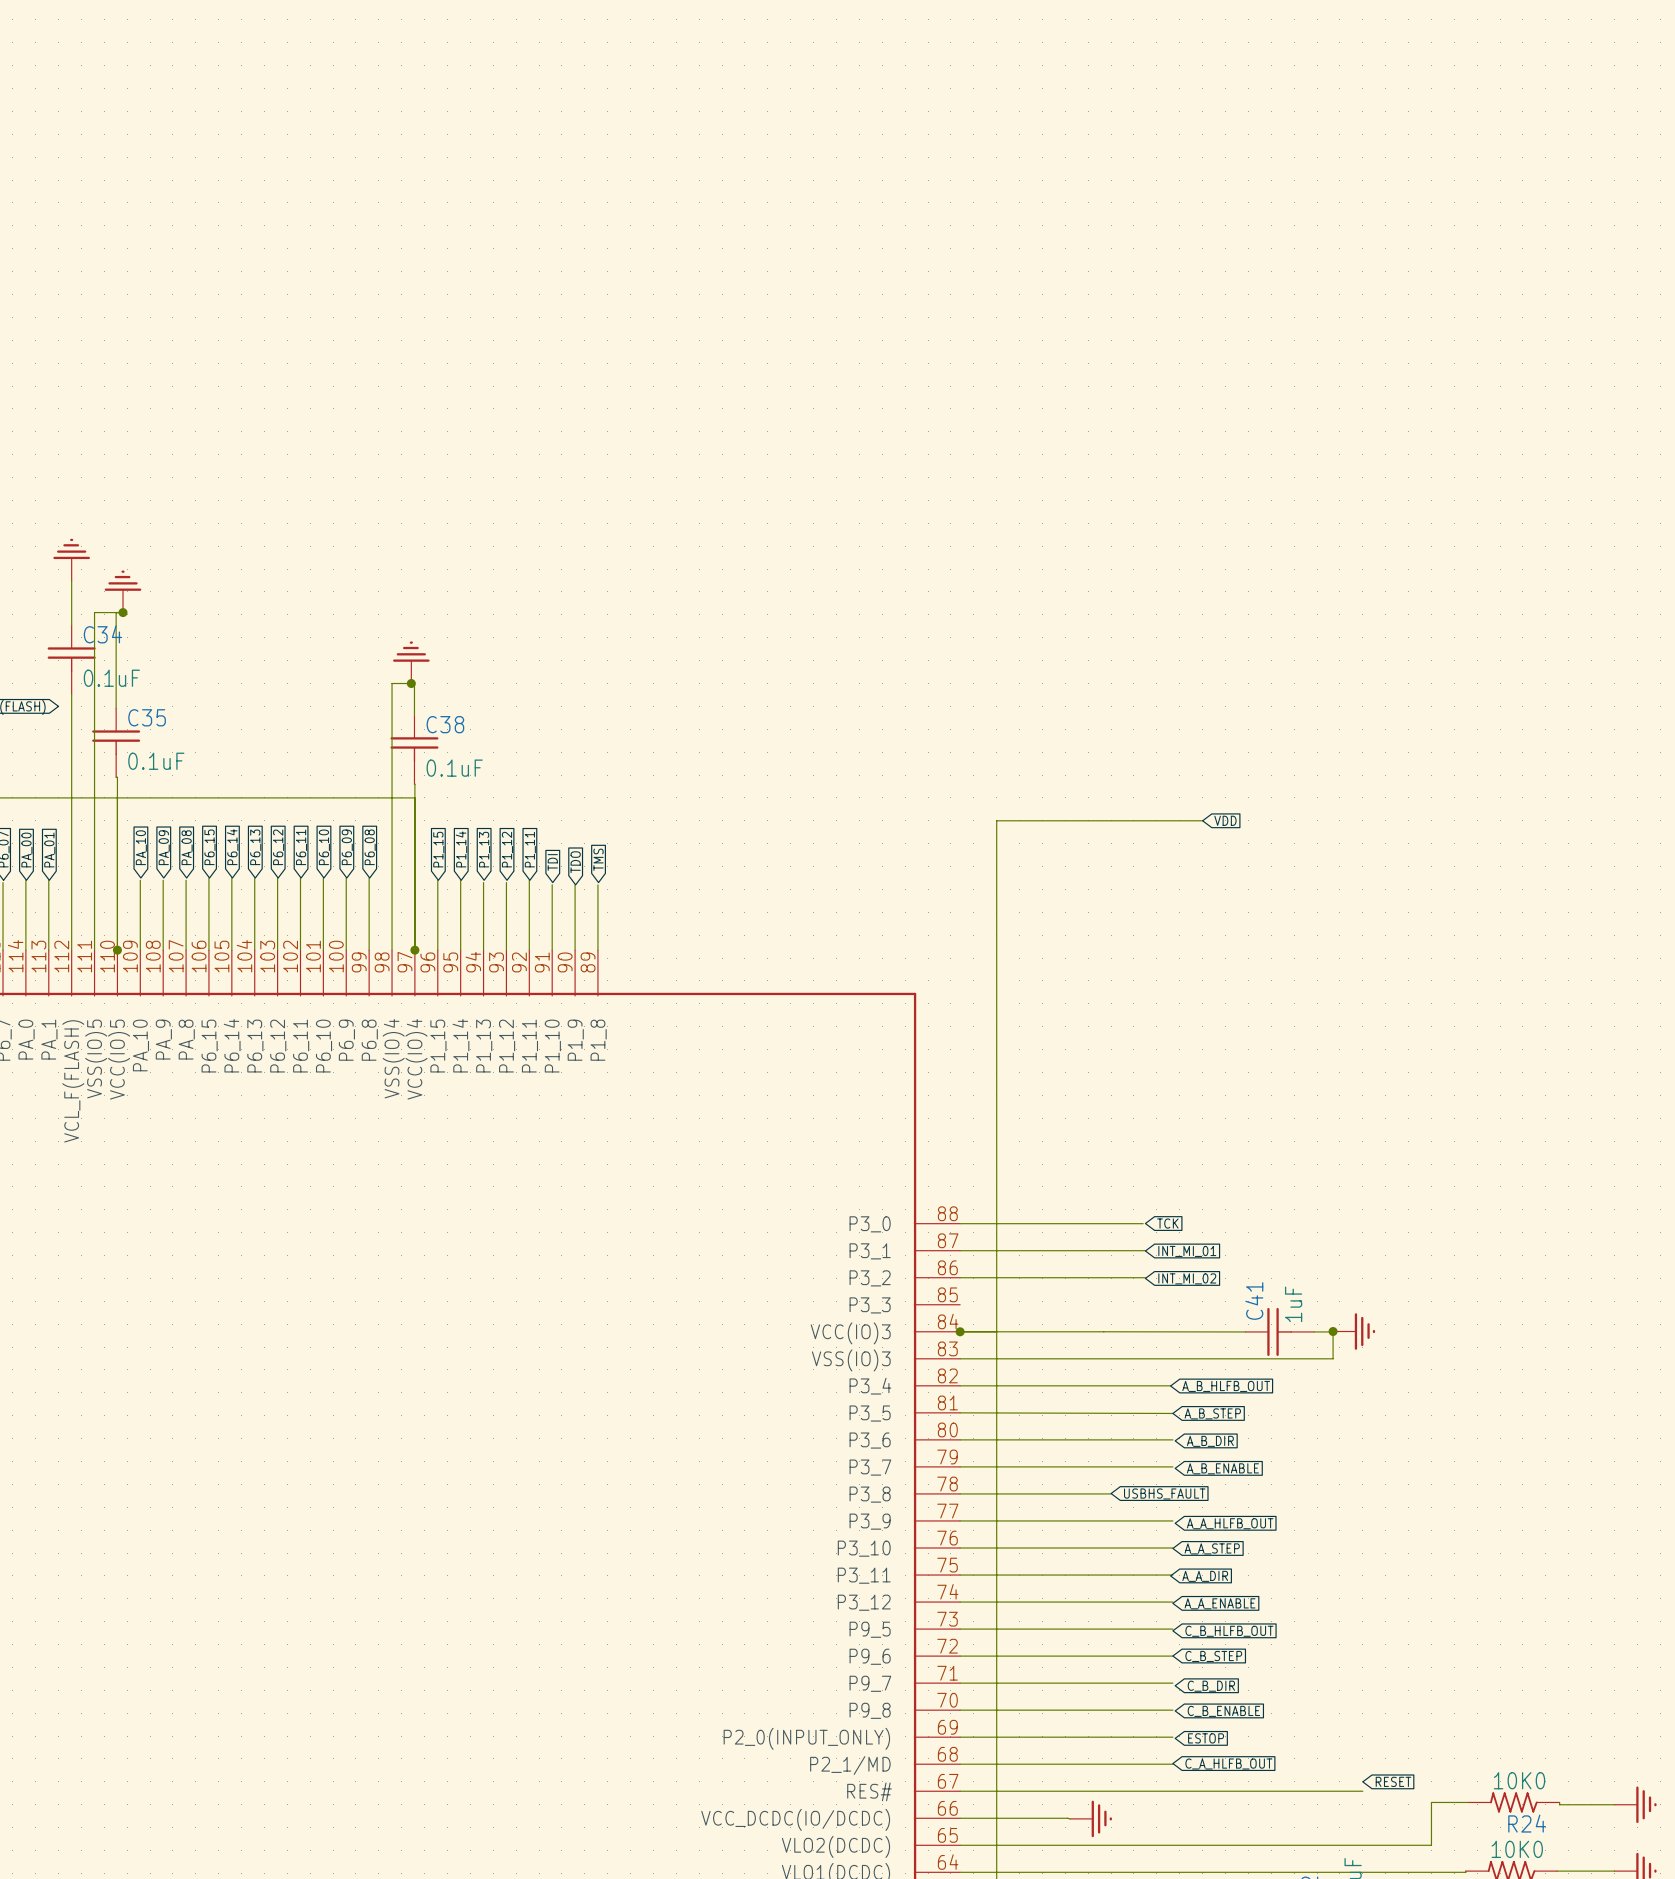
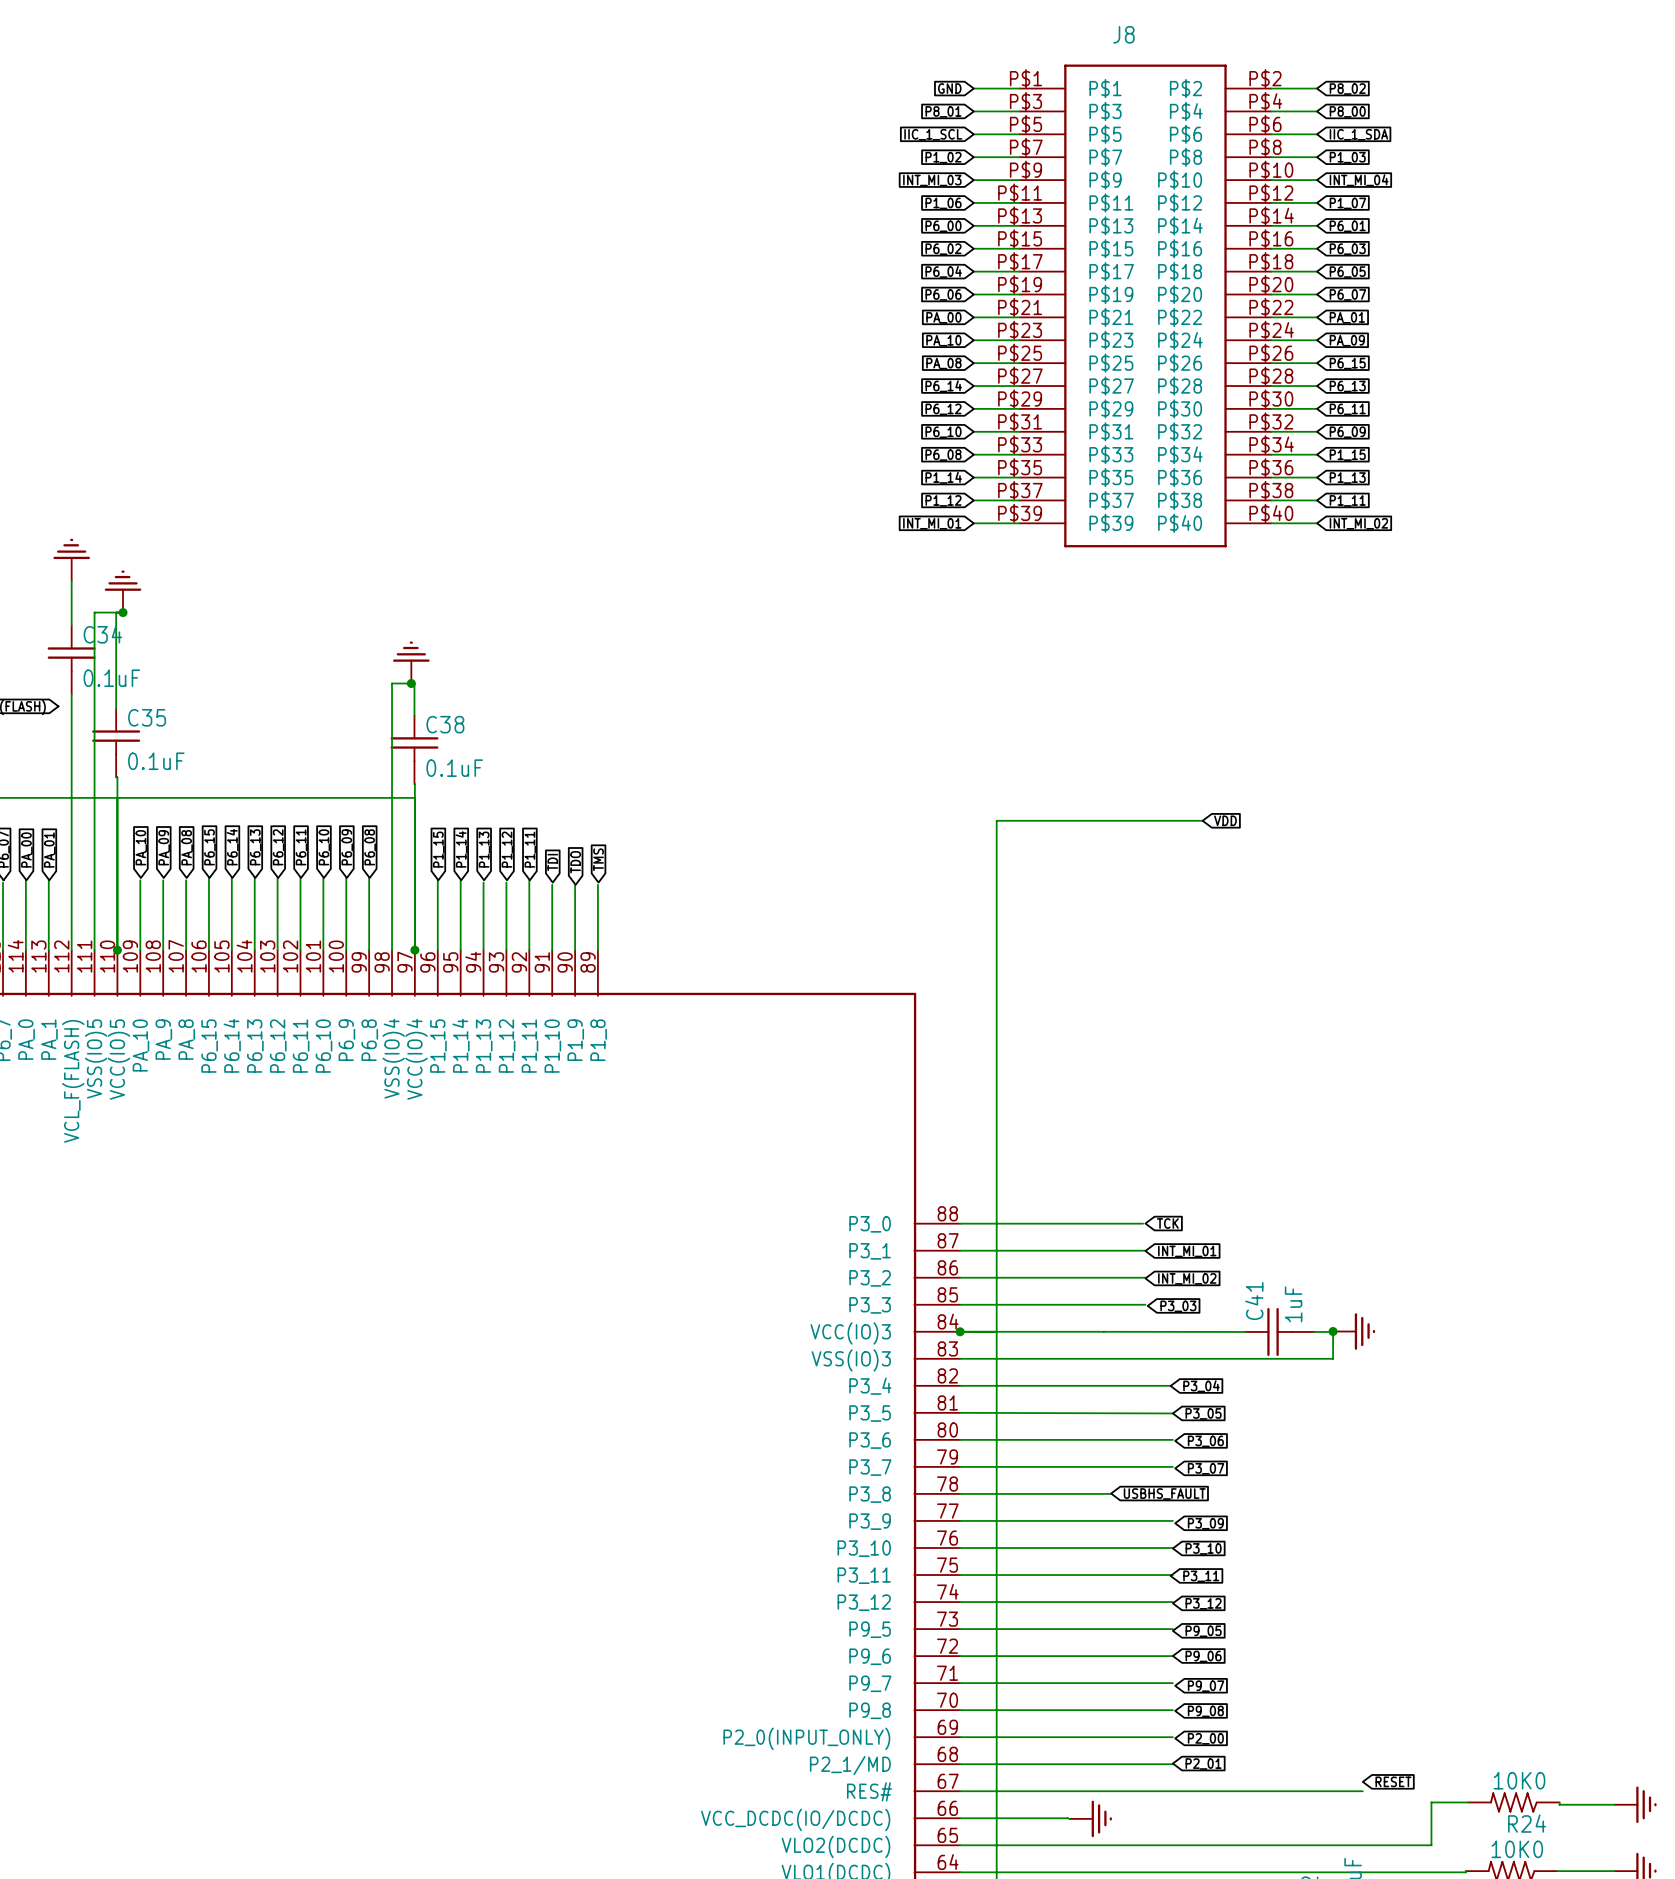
global label: none -> GND (949, 88)
wire: none -> (973, 88) (1019, 88)
wire: none -> (1271, 88) (1317, 88)
global label: none -> P8_02 (1347, 88)
global label: none -> P8_01 (943, 111)
wire: none -> (973, 111) (1019, 111)
wire: none -> (1271, 111) (1317, 111)
global label: none -> P8_00 (1347, 111)
global label: none -> IIC_1_SCL (933, 134)
wire: none -> (973, 134) (1019, 134)
wire: none -> (1271, 134) (1317, 134)
global label: none -> IIC_1_SDA (1358, 134)
global label: none -> P1_02 (943, 157)
wire: none -> (973, 157) (1019, 157)
wire: none -> (1271, 157) (1317, 157)
global label: none -> P1_03 (1347, 157)
global label: none -> INT_MI_03 (932, 180)
wire: none -> (973, 180) (1019, 180)
wire: none -> (1271, 180) (1317, 180)
global label: none -> INT_MI_04 (1359, 180)
wire: none -> (973, 202) (1019, 202)
wire: none -> (1271, 202) (1317, 202)
global label: none -> P1_06 (943, 203)
global label: none -> P1_07 (1347, 203)
wire: none -> (973, 225) (1019, 225)
wire: none -> (1271, 225) (1317, 225)
global label: none -> P6_00 (943, 226)
global label: none -> P6_01 (1347, 226)
wire: none -> (973, 248) (1019, 248)
wire: none -> (1271, 248) (1317, 248)
global label: none -> P6_02 (943, 249)
global label: none -> P6_03 (1347, 249)
global label: none -> P6_04 (943, 271)
wire: none -> (973, 271) (1019, 271)
wire: none -> (1271, 271) (1317, 271)
global label: none -> P6_05 (1347, 272)
global label: none -> P6_06 (943, 294)
wire: none -> (973, 294) (1019, 294)
wire: none -> (1271, 294) (1317, 294)
global label: none -> P6_07 (1347, 294)
J8: none -> (1145, 305)
global label: none -> PA_00 (943, 317)
wire: none -> (973, 317) (1019, 317)
wire: none -> (1271, 317) (1317, 317)
global label: none -> PA_01 (1347, 317)
global label: none -> PA_10 (943, 340)
wire: none -> (973, 340) (1019, 340)
wire: none -> (1271, 340) (1317, 340)
global label: none -> PA_09 (1347, 340)
global label: none -> PA_08 (943, 363)
wire: none -> (973, 363) (1019, 363)
wire: none -> (1271, 363) (1317, 363)
global label: none -> P6_15 (1347, 363)
global label: none -> P6_14 (943, 386)
wire: none -> (973, 386) (1019, 386)
wire: none -> (1271, 386) (1317, 386)
global label: none -> P6_13 (1347, 386)
wire: none -> (973, 408) (1019, 408)
wire: none -> (1271, 408) (1317, 408)
global label: none -> P6_12 (943, 409)
global label: none -> P6_11 (1347, 409)
wire: none -> (973, 431) (1019, 431)
wire: none -> (1271, 431) (1317, 431)
global label: none -> P6_10 (943, 432)
global label: none -> P6_09 (1347, 432)
wire: none -> (973, 454) (1019, 454)
wire: none -> (1271, 454) (1317, 454)
global label: none -> P6_08 (943, 455)
global label: none -> P1_15 (1347, 455)
global label: none -> P1_14 (943, 477)
wire: none -> (973, 477) (1019, 477)
wire: none -> (1271, 477) (1317, 477)
global label: none -> P1_13 (1347, 477)
global label: none -> P1_12 (943, 500)
wire: none -> (973, 500) (1019, 500)
wire: none -> (1271, 500) (1317, 500)
global label: none -> P1_11 (1347, 500)
global label: none -> INT_MI_01 (932, 523)
wire: none -> (973, 523) (1019, 523)
wire: none -> (1271, 523) (1317, 523)
global label: none -> INT_MI_02 (1358, 523)
wire: none -> (960, 1304) (1145, 1304)
global label: none -> P3_03 (1178, 1306)
global label: A_B_HLFB_OUT (1226, 1386) -> P3_04 (1201, 1386)
global label: A_B_STEP (1212, 1413) -> P3_05 (1203, 1413)
global label: A_B_DIR (1210, 1441) -> P3_06 (1205, 1441)
global label: A_B_ENABLE (1222, 1468) -> P3_07 (1206, 1468)
global label: A_A_HLFB_OUT (1230, 1523) -> P3_09 (1205, 1523)
global label: A_A_STEP (1212, 1548) -> P3_10 (1203, 1548)
global label: A_A_DIR (1205, 1576) -> P3_11 (1201, 1576)
global label: A_A_ENABLE (1220, 1603) -> P3_12 (1203, 1603)
global label: C_B_HLFB_OUT (1229, 1631) -> P9_05 (1203, 1631)
global label: C_B_STEP (1213, 1656) -> P9_06 (1203, 1656)
global label: C_B_DIR (1211, 1686) -> P9_07 (1206, 1686)
global label: C_B_ENABLE (1223, 1711) -> P9_08 (1205, 1711)
global label: ESTOP (1206, 1738) -> P2_00 (1205, 1738)
global label: C_A_HLFB_OUT (1228, 1763) -> P2_01 (1203, 1763)

